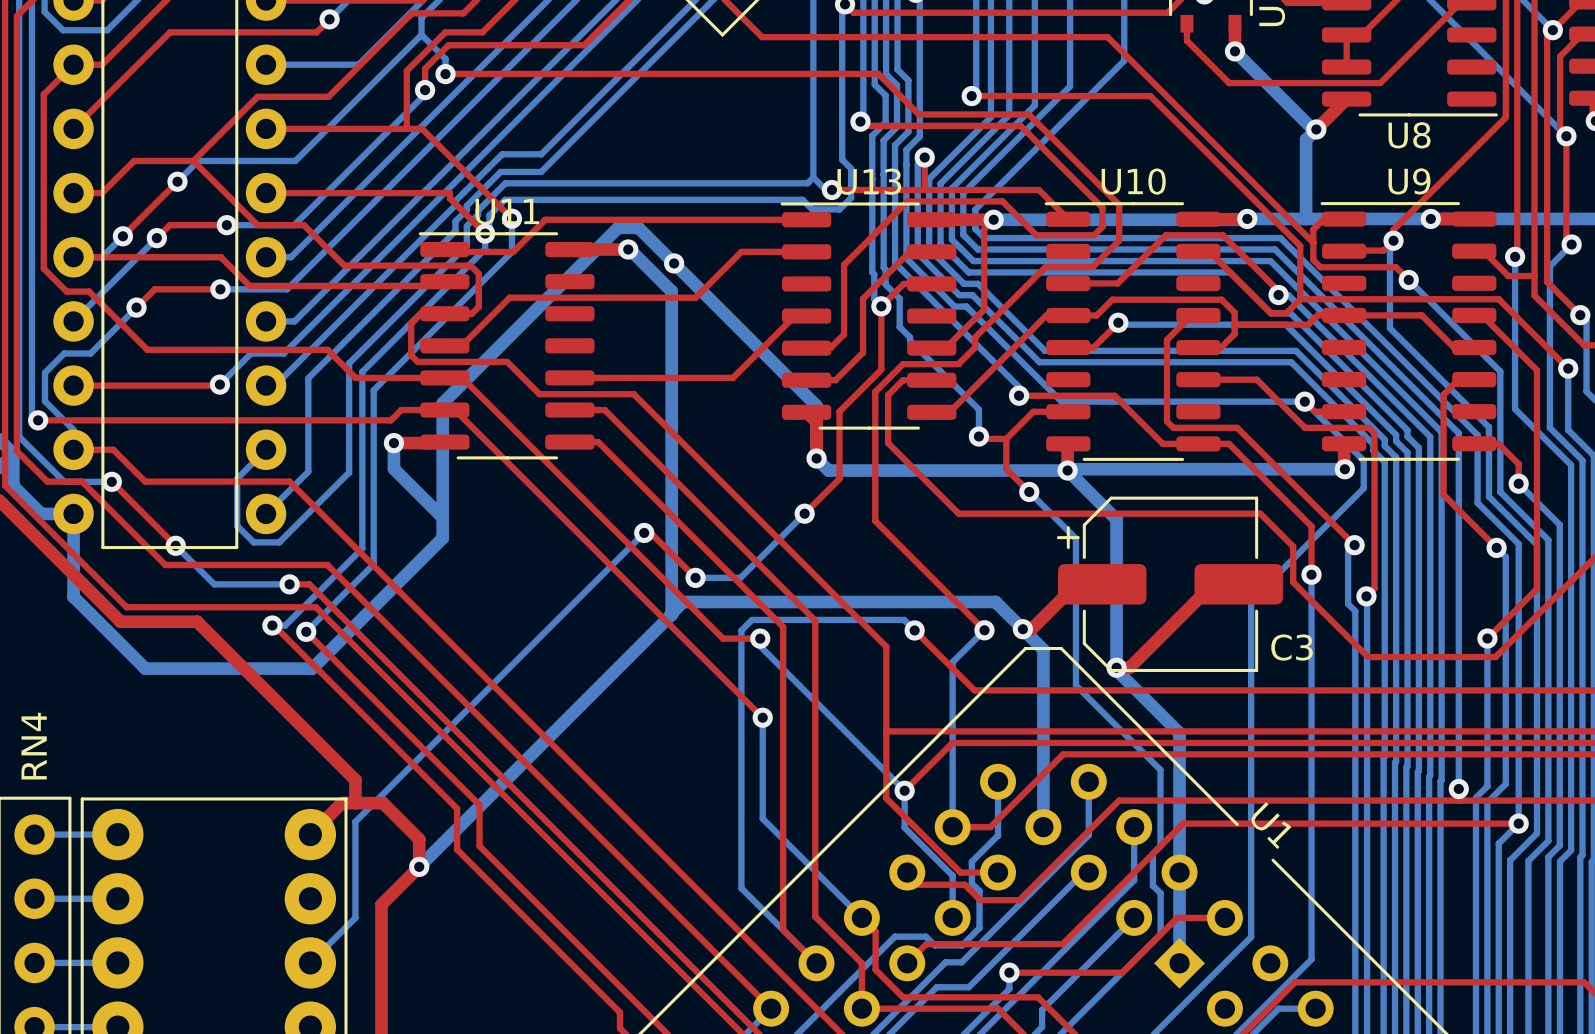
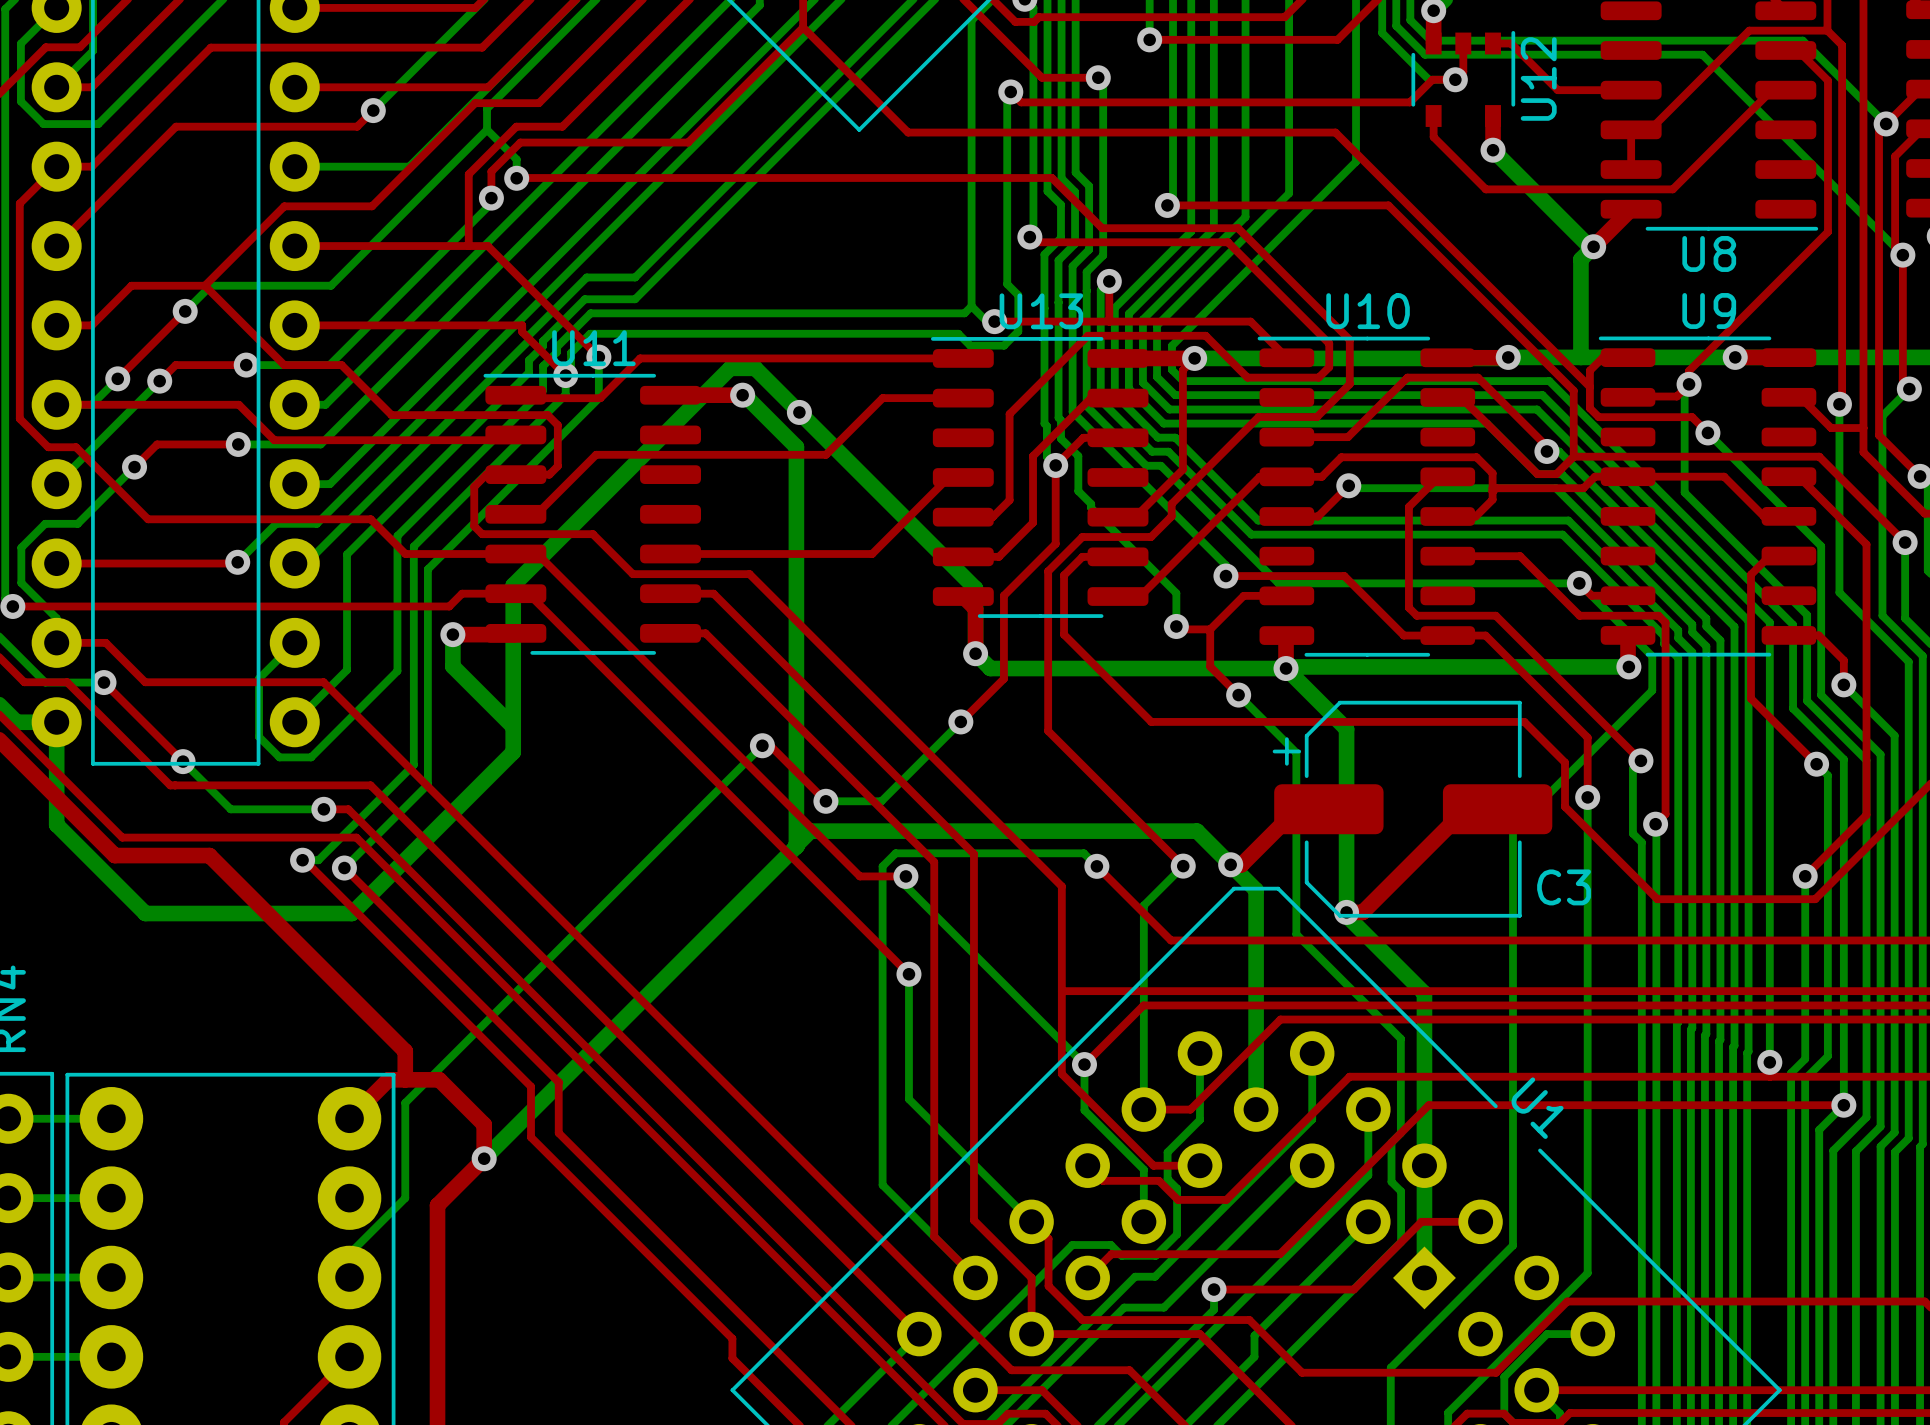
bottom track: (355, 898) (355, 917) (310, 962) -> (405, 1198) (340, 1262) (340, 1276)

